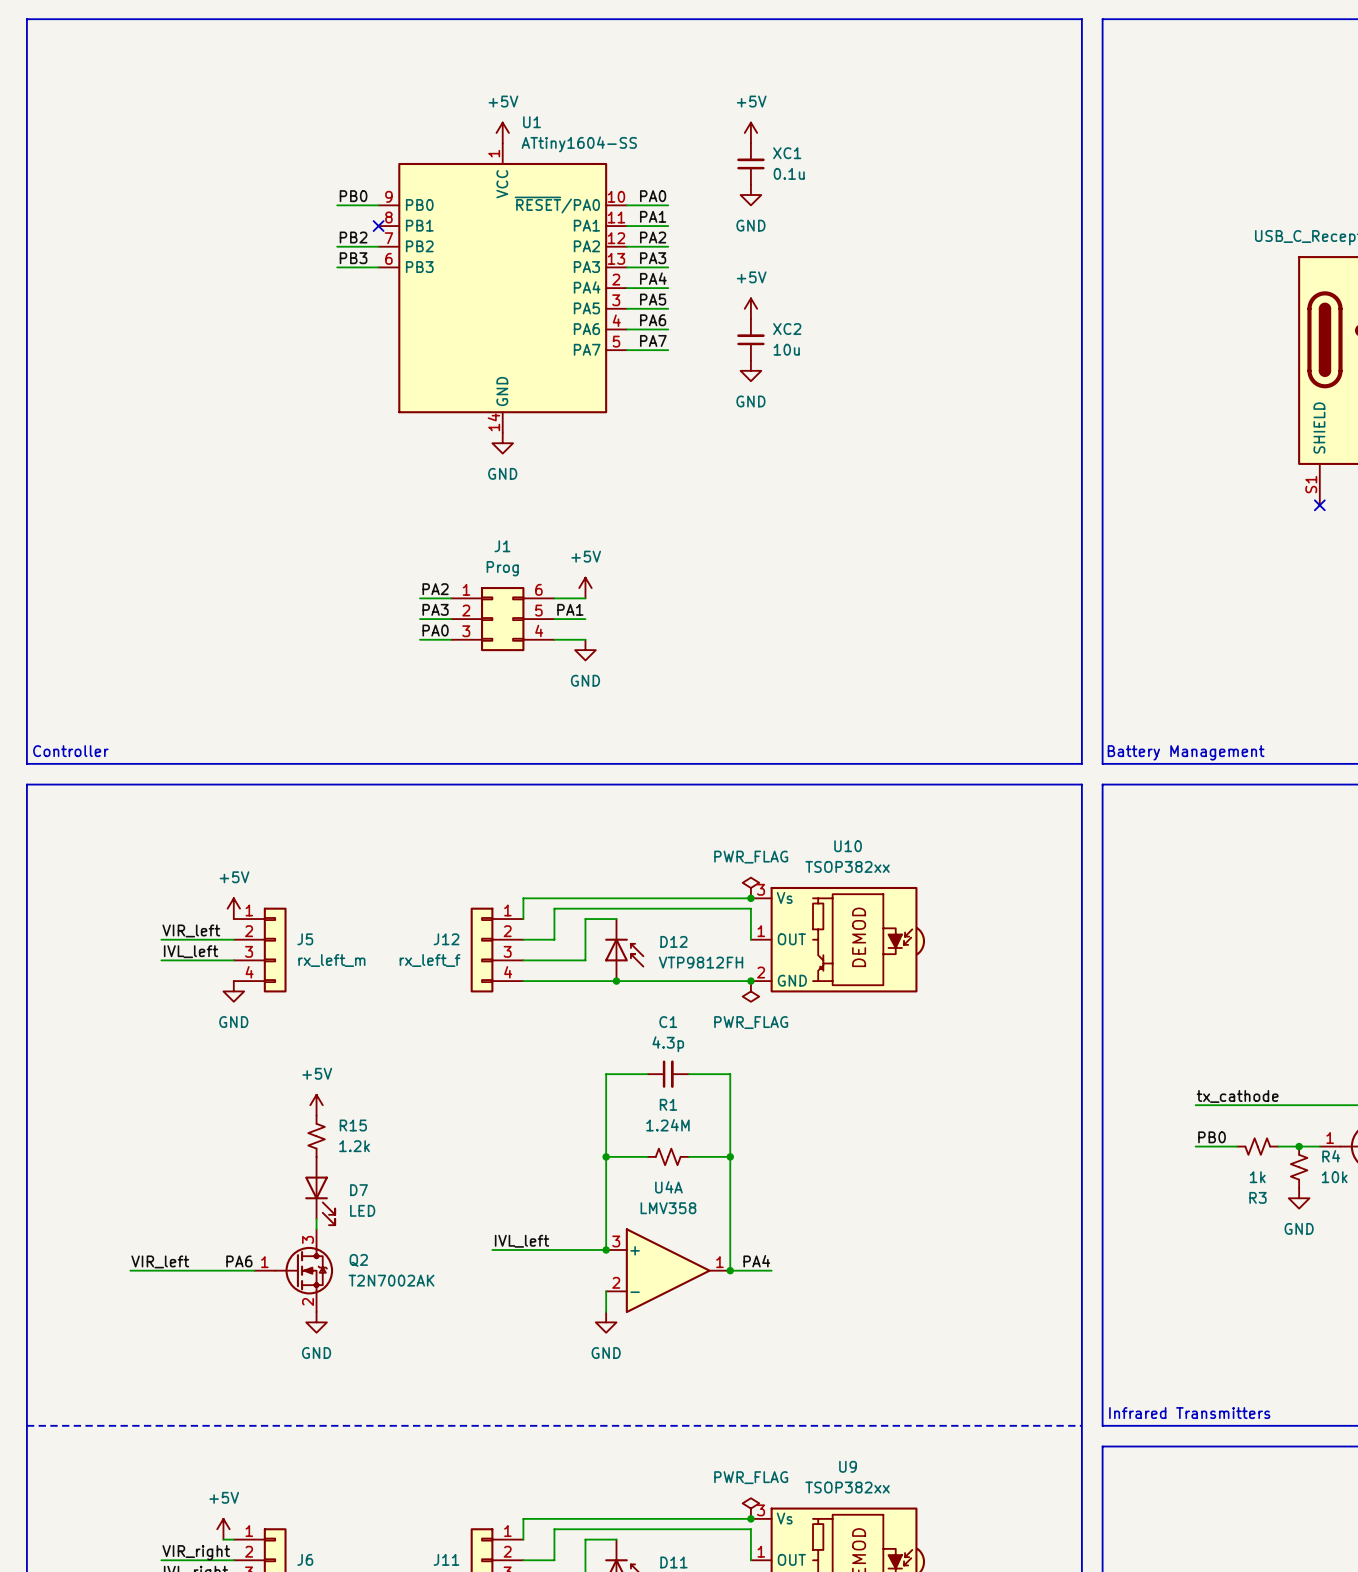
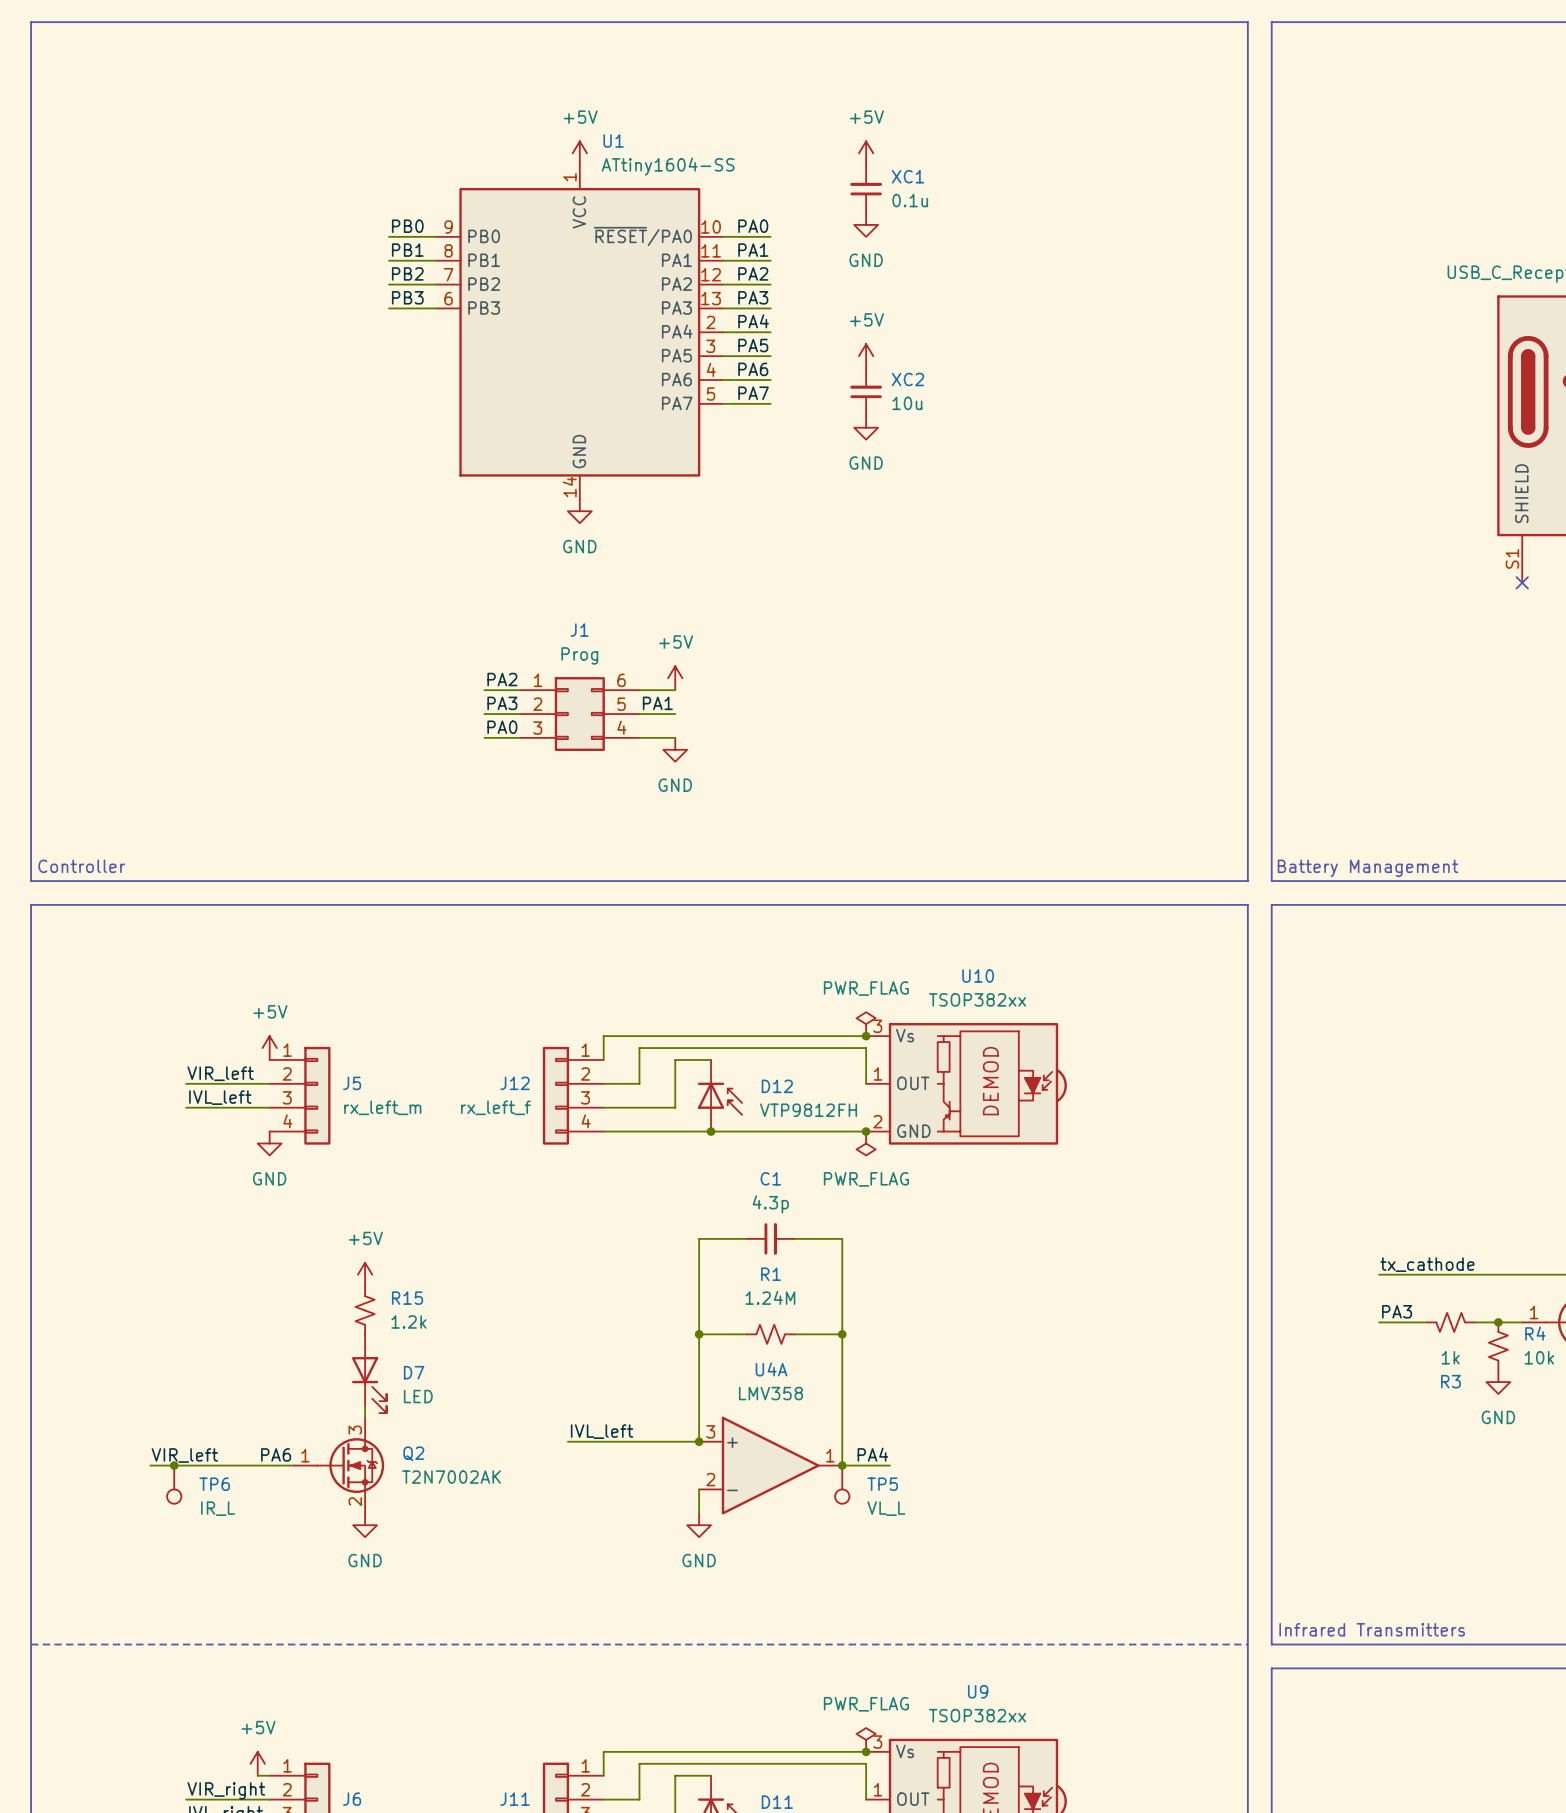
label: none -> PB1 (407, 250)
wire: none -> (388, 260) (436, 260)
no-connect mark: (378, 226) -> none
label: PB0 (1212, 1137) -> PA3 (1397, 1311)
junction: none -> (174, 1465)
TP6: none -> IR_L (174, 1484)
TP5: none -> VL_L (842, 1484)

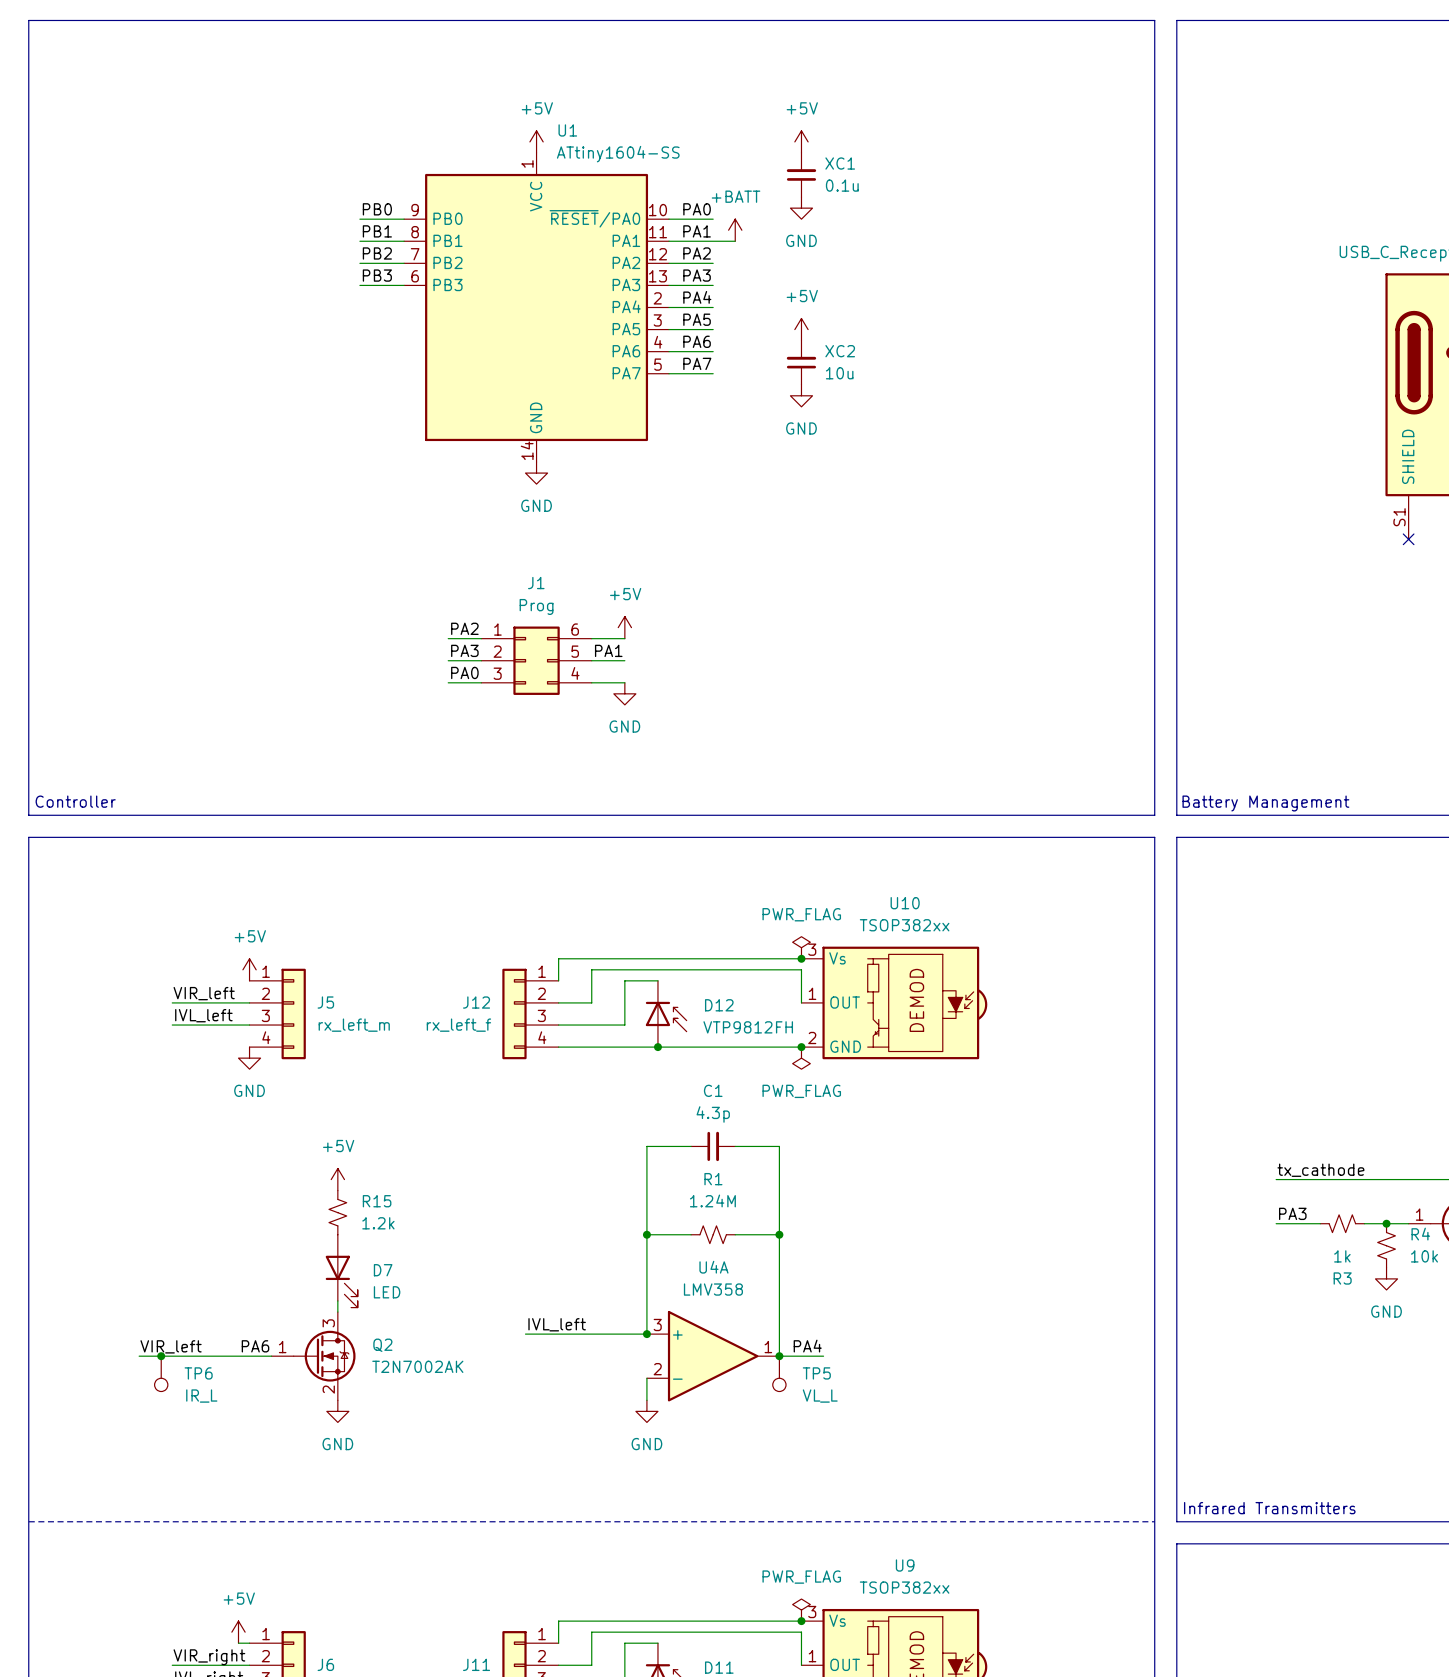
power symbol: none -> +BATT (735, 230)
wire: none -> (713, 241) (735, 241)

